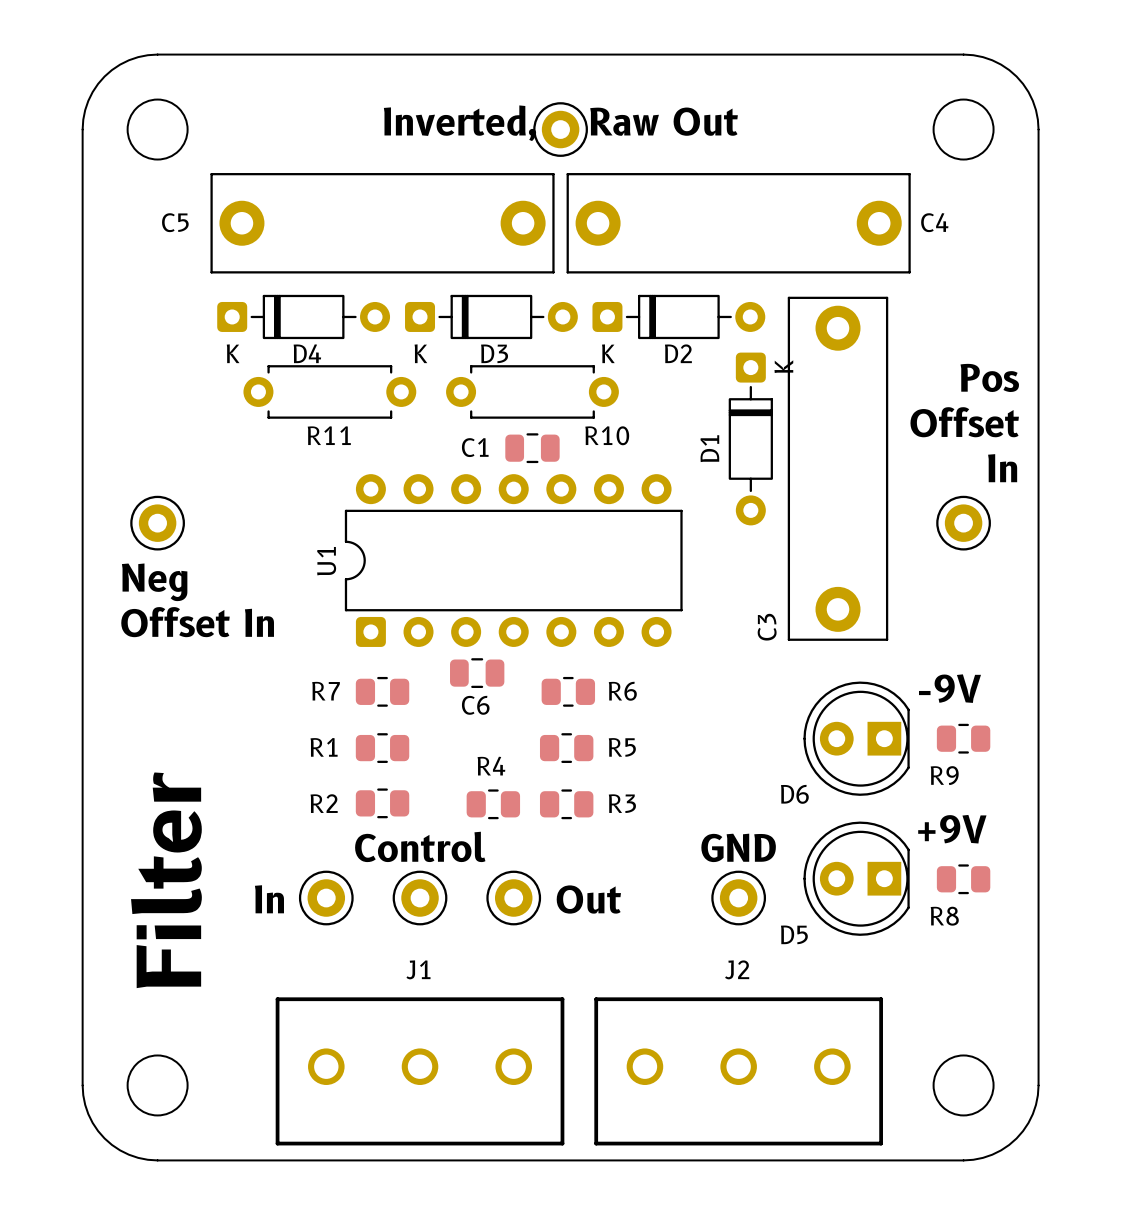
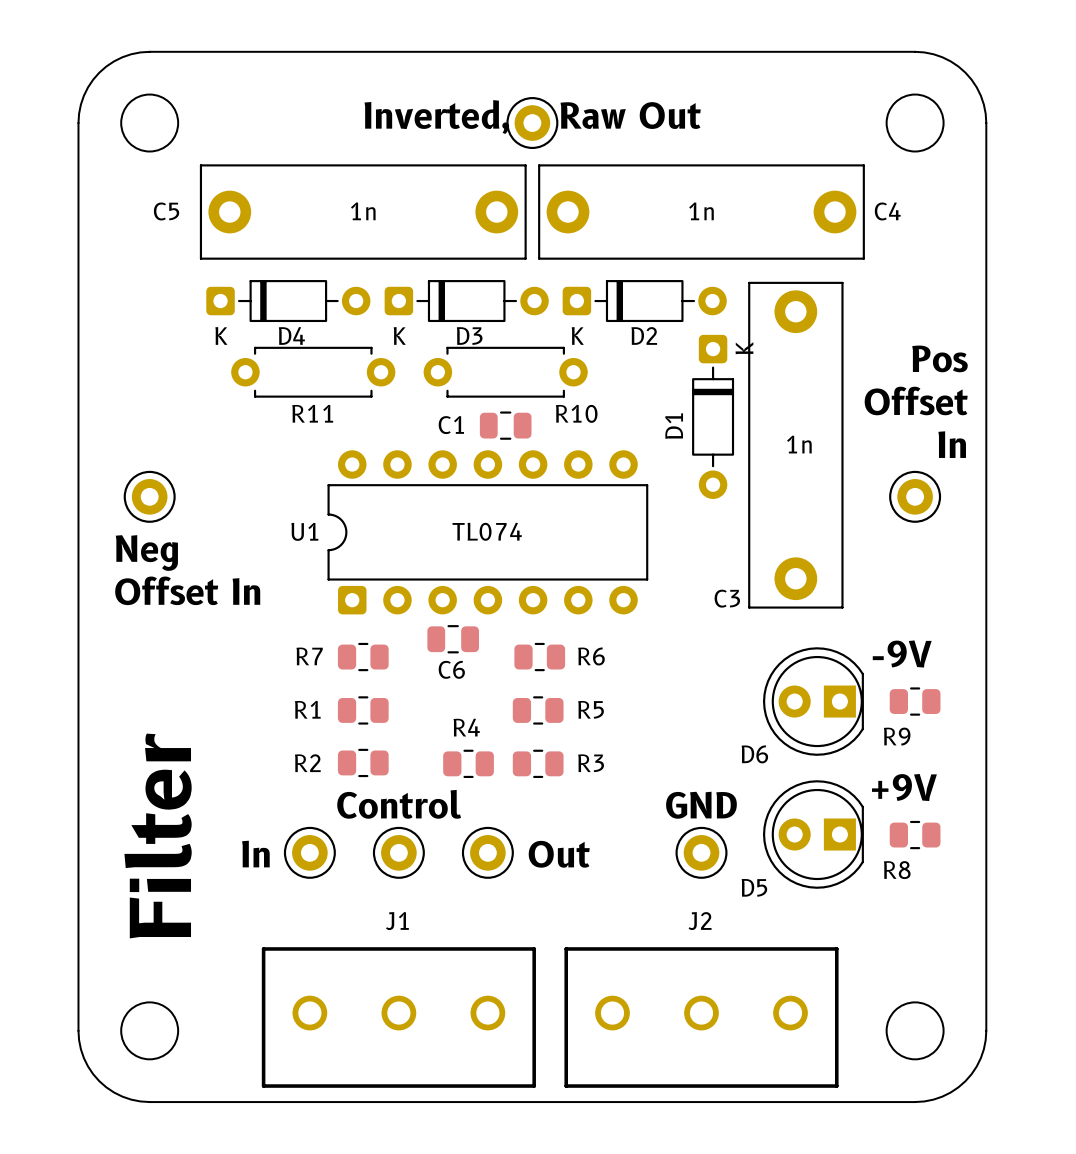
C5 value: none -> 1n (363, 211)
C4 value: none -> 1n (701, 211)
C3 value: none -> 1n (799, 444)
U1 value: none -> TL074 (487, 531)
U1 name rotation: 0° (326, 561) -> 90° clockwise (304, 531)
C3 name rotation: 0° (767, 627) -> 90° clockwise (727, 598)

